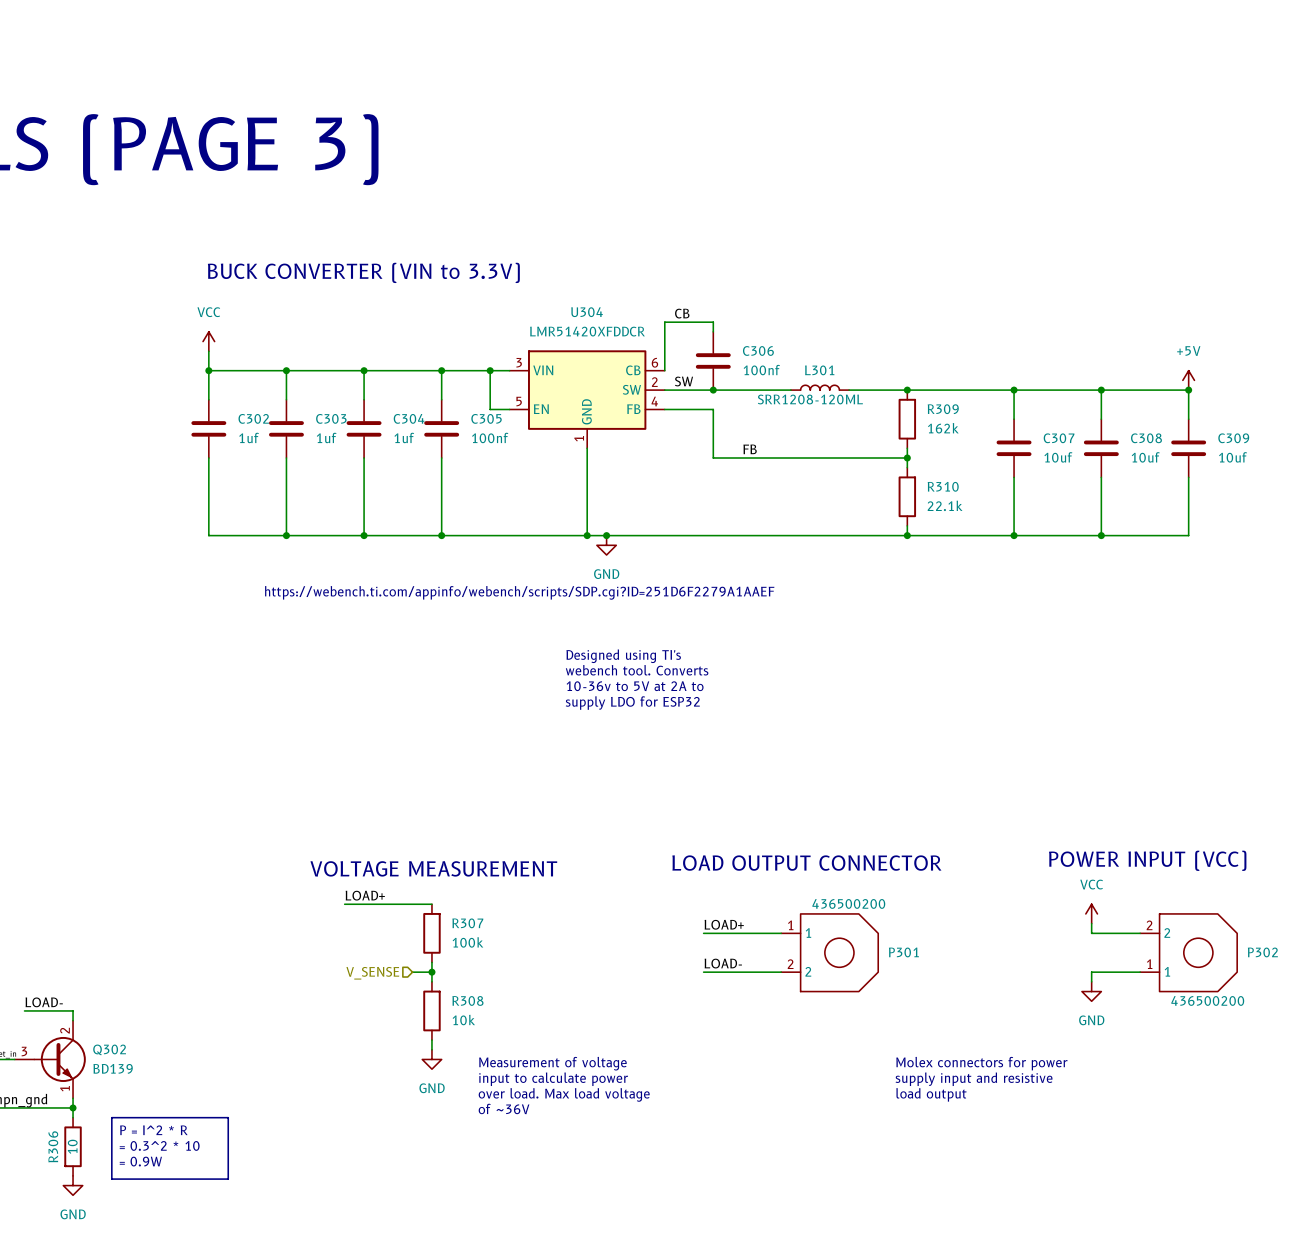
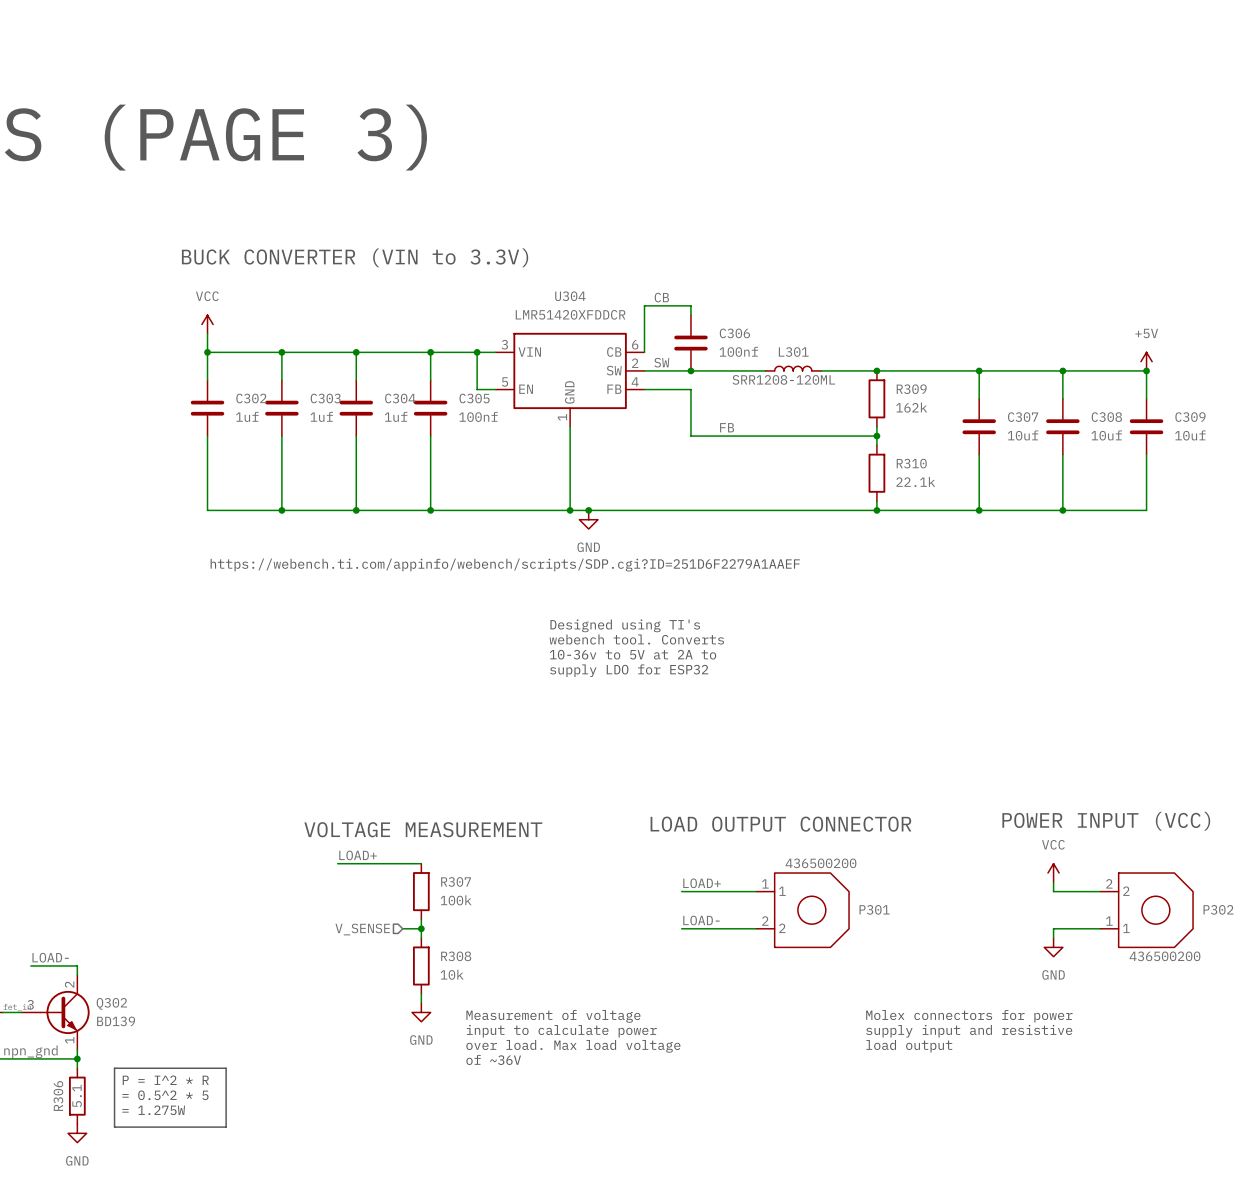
text: = 0.3^2 * 10 (159, 1145) -> = 0.5^2 * 5 (165, 1095)
R306 value: 10 (72, 1146) -> 5.1 (77, 1095)
text: = 0.9W (140, 1161) -> = 1.275W (153, 1110)

